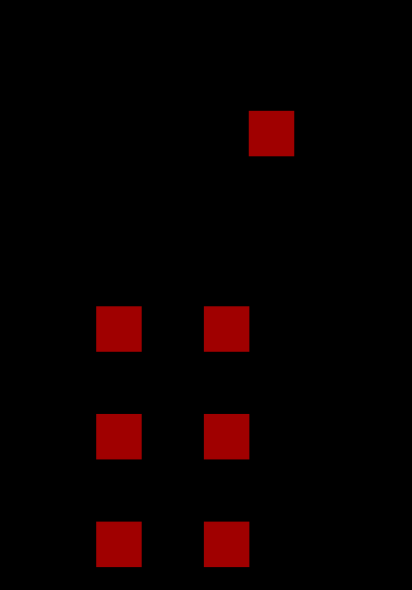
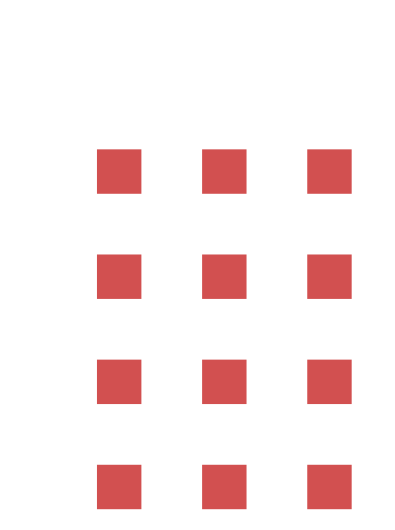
part: (271, 133) -> none
part: none -> (119, 171)
part: none -> (224, 171)
part: none -> (329, 171)
part: none -> (329, 276)
part: none -> (329, 381)
part: none -> (329, 486)

